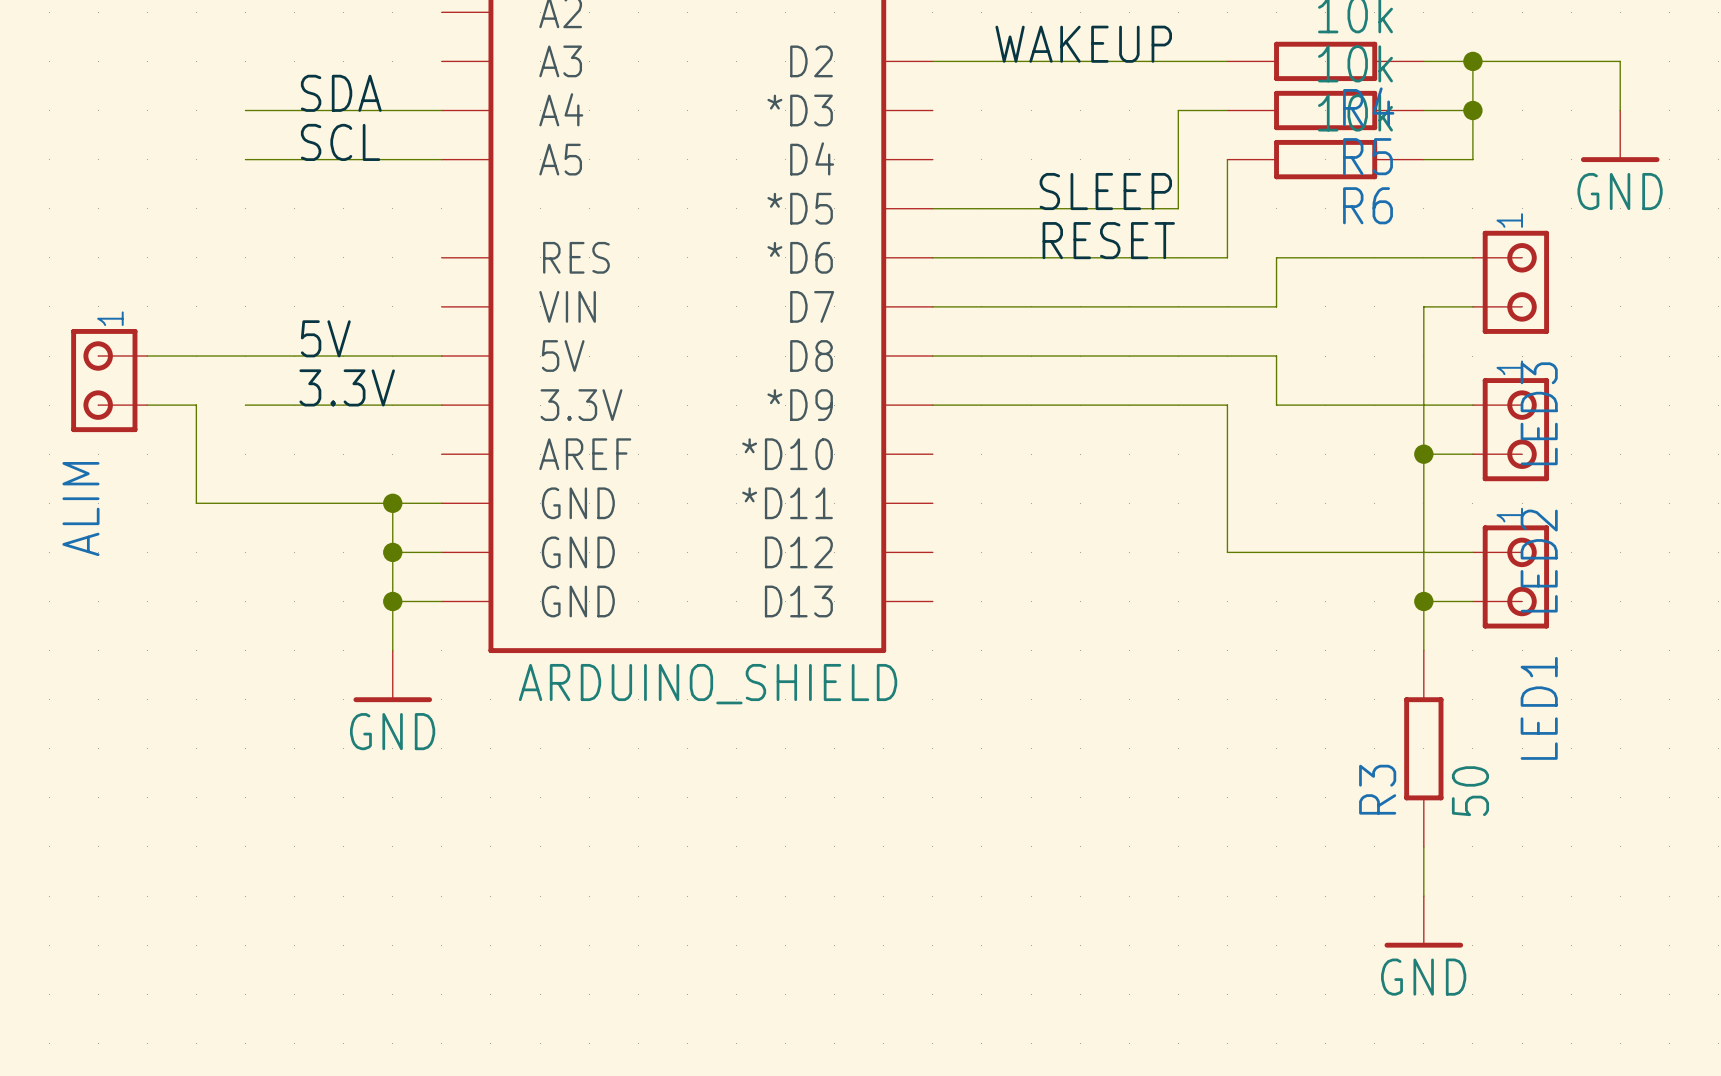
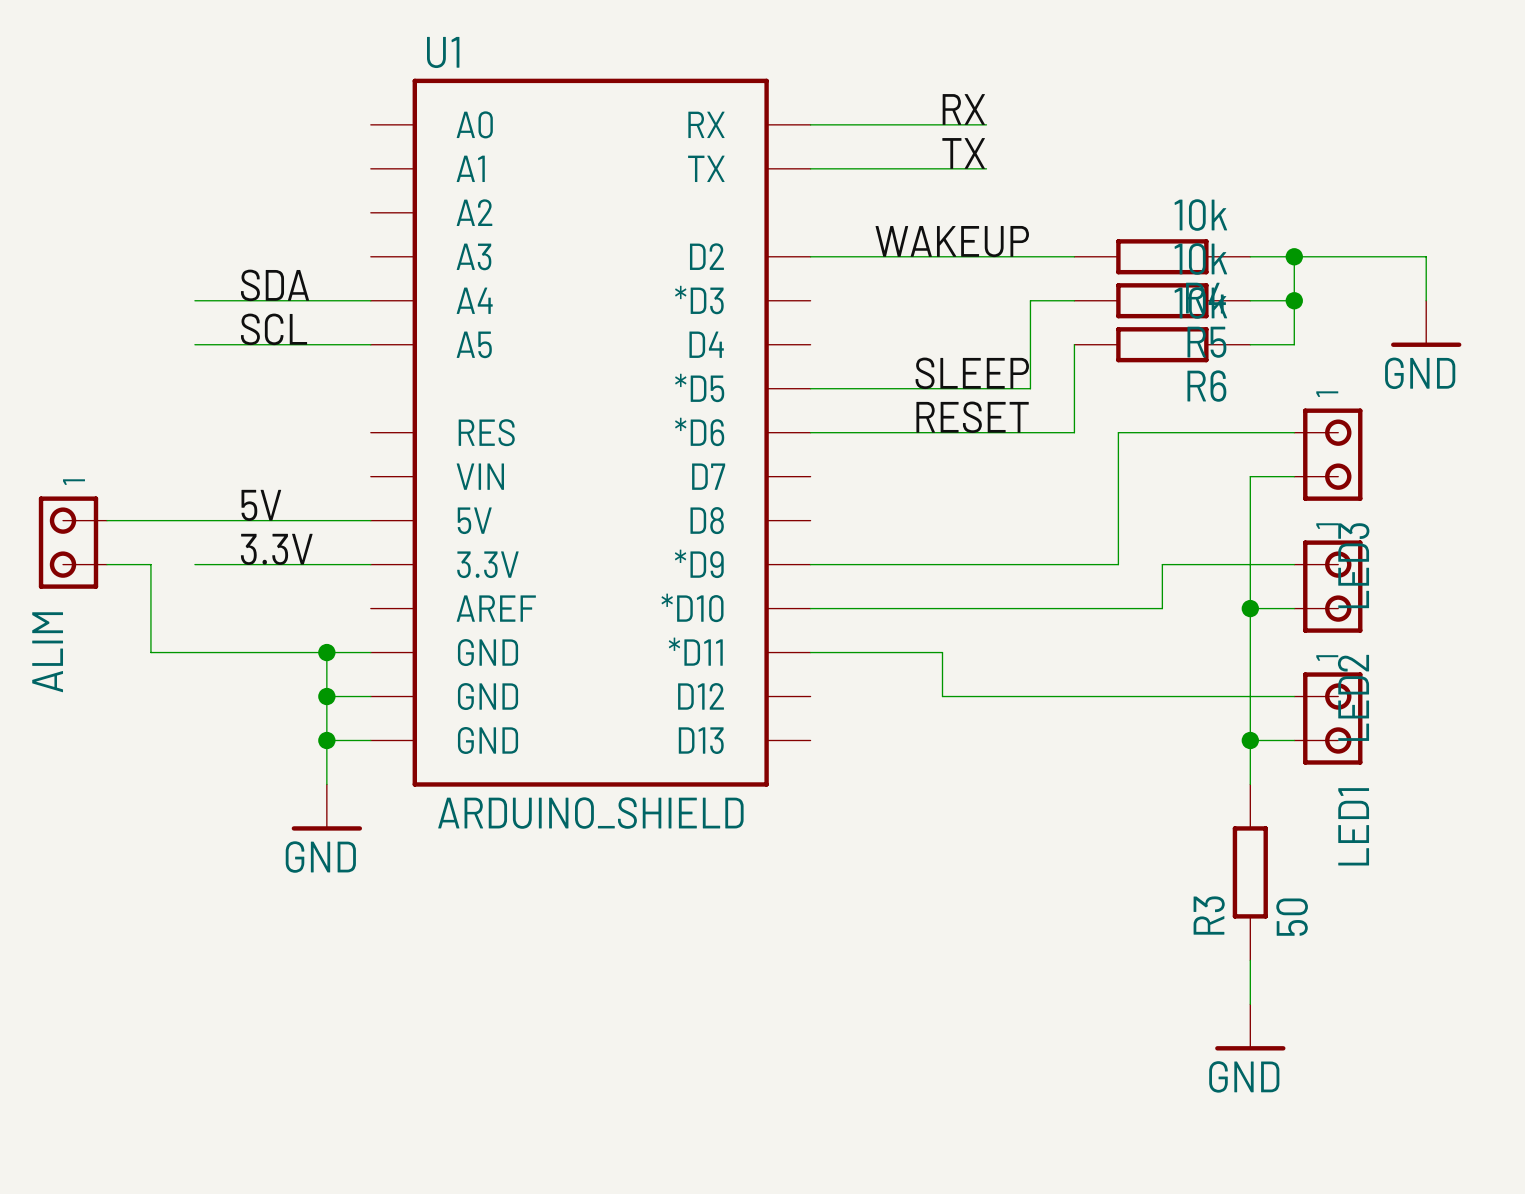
wire: (932, 306) (1276, 306) -> (1118, 520) (1118, 476)
wire: (932, 356) (1276, 356) -> none
wire: (1227, 405) (1227, 552) -> (810, 652) (942, 652) (942, 696) (1074, 696)
wire: (1276, 405) (1325, 405) -> (1118, 564) (1074, 564)
wire: none -> (1162, 564) (1162, 608) (810, 608)

